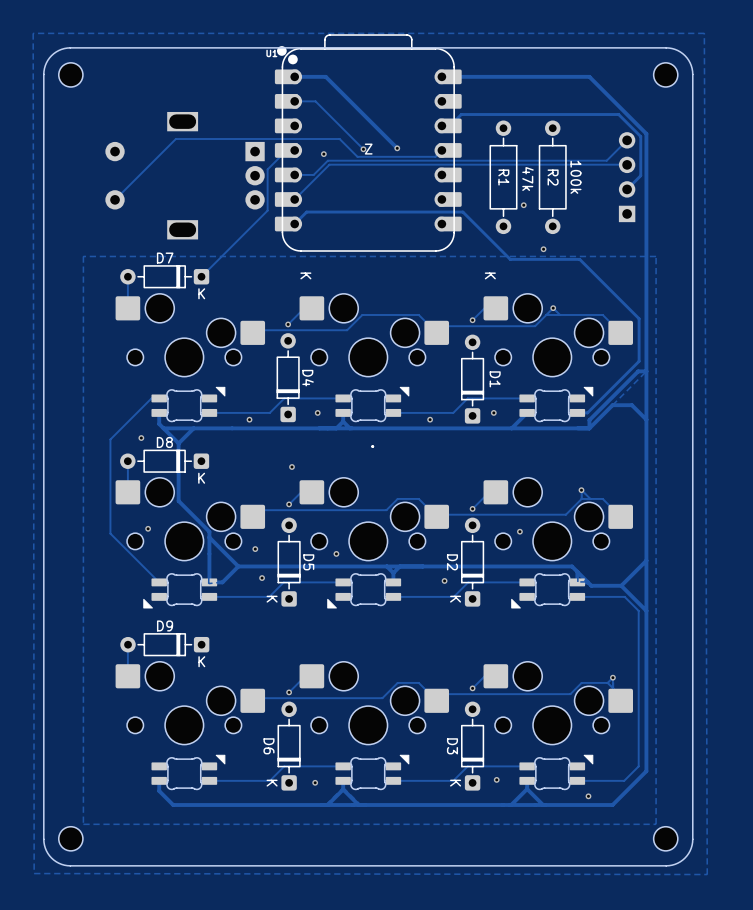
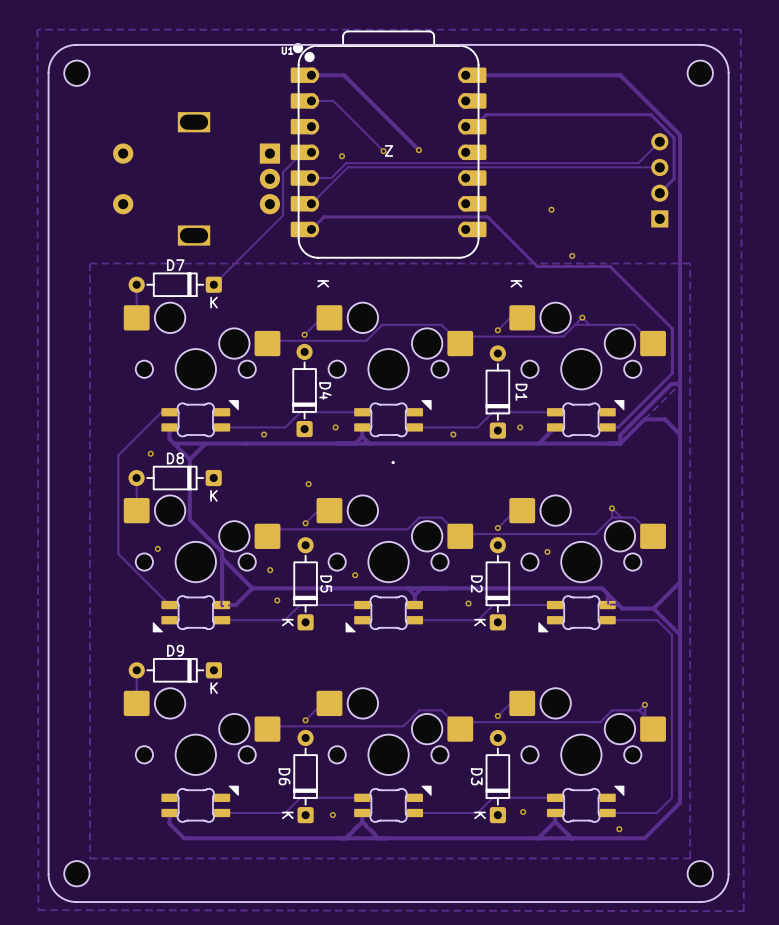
track: (441, 150) (435, 156) (357, 156) (339, 139) (175, 139) (115, 199) -> none
R1: 47k (503, 177) -> none
R2: 100k (552, 177) -> none

